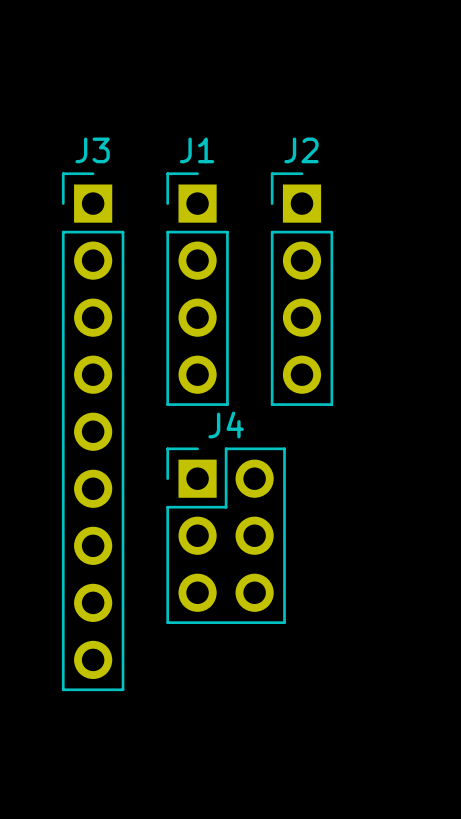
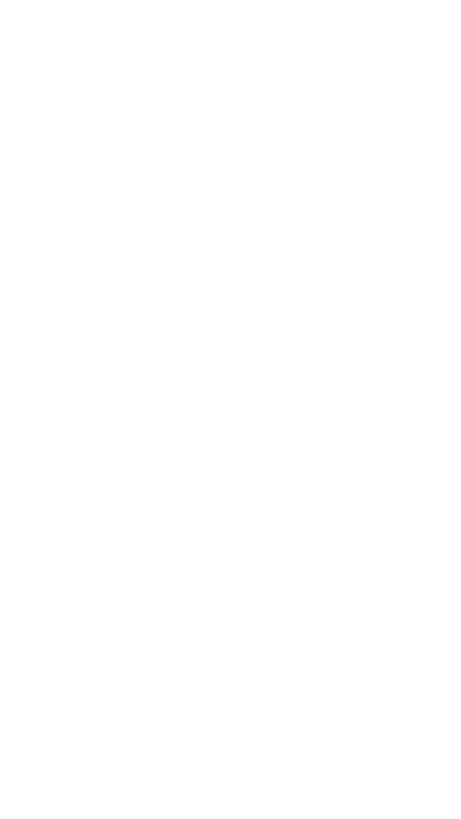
J1: (197, 289) -> none
J2: (302, 289) -> none
J3: (93, 431) -> none
J4: (226, 535) -> none

